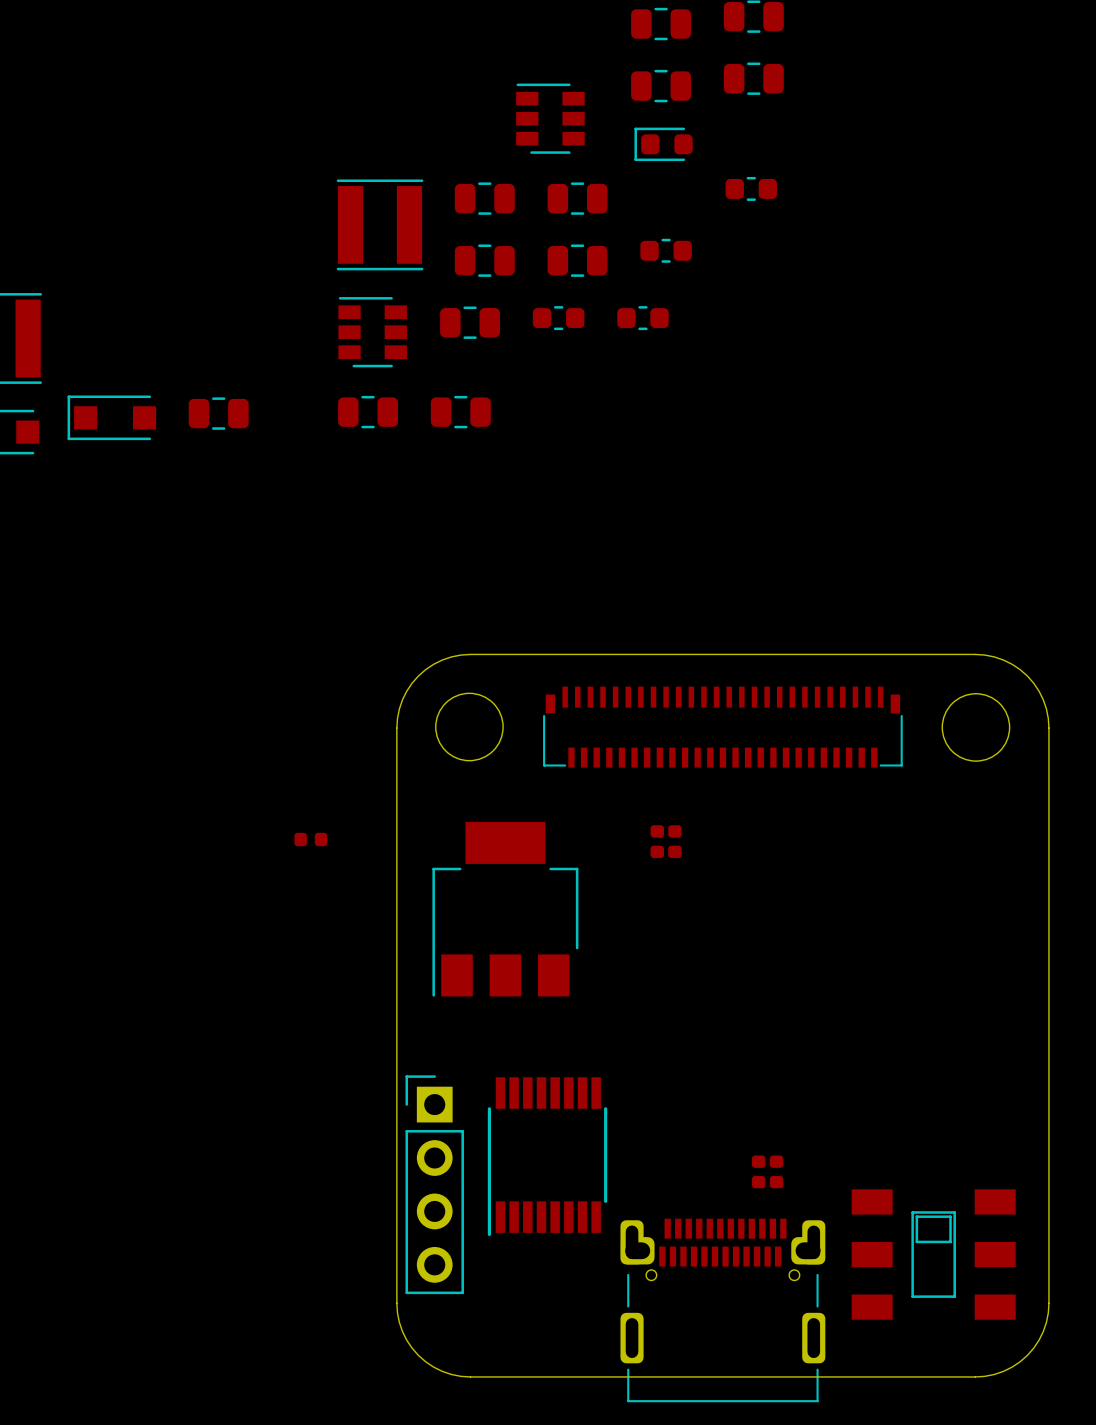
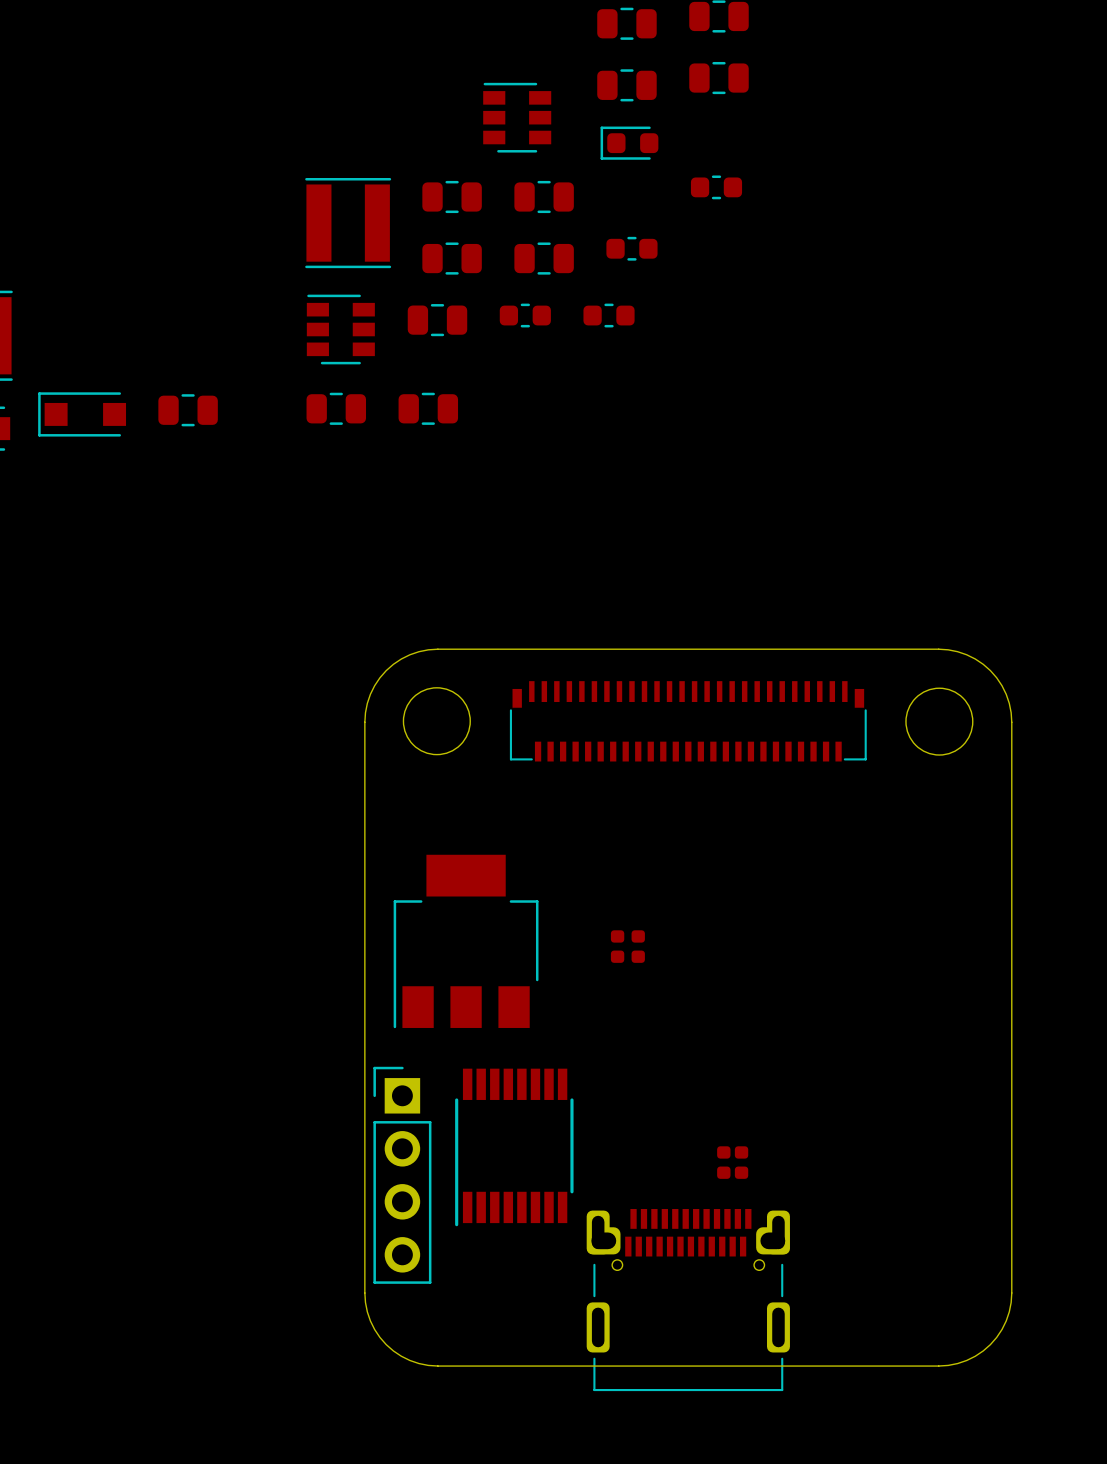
part: (310, 839) -> none
part: (657, 841) -> none
part: (674, 841) -> none
part position: (505, 909) -> (466, 941)
part: none -> (617, 946)
part: none -> (638, 946)
part: (933, 1254) -> none

